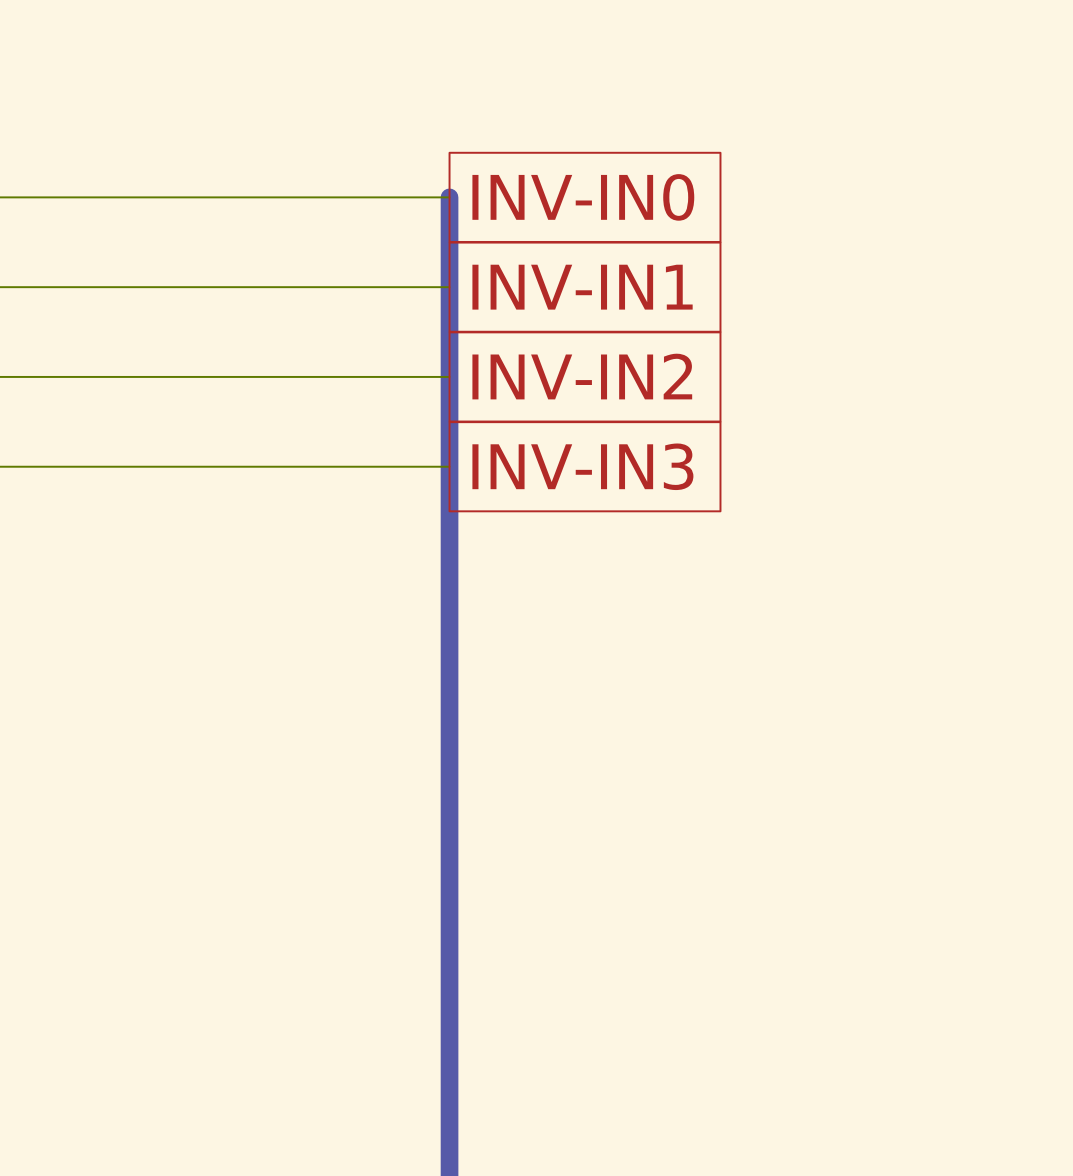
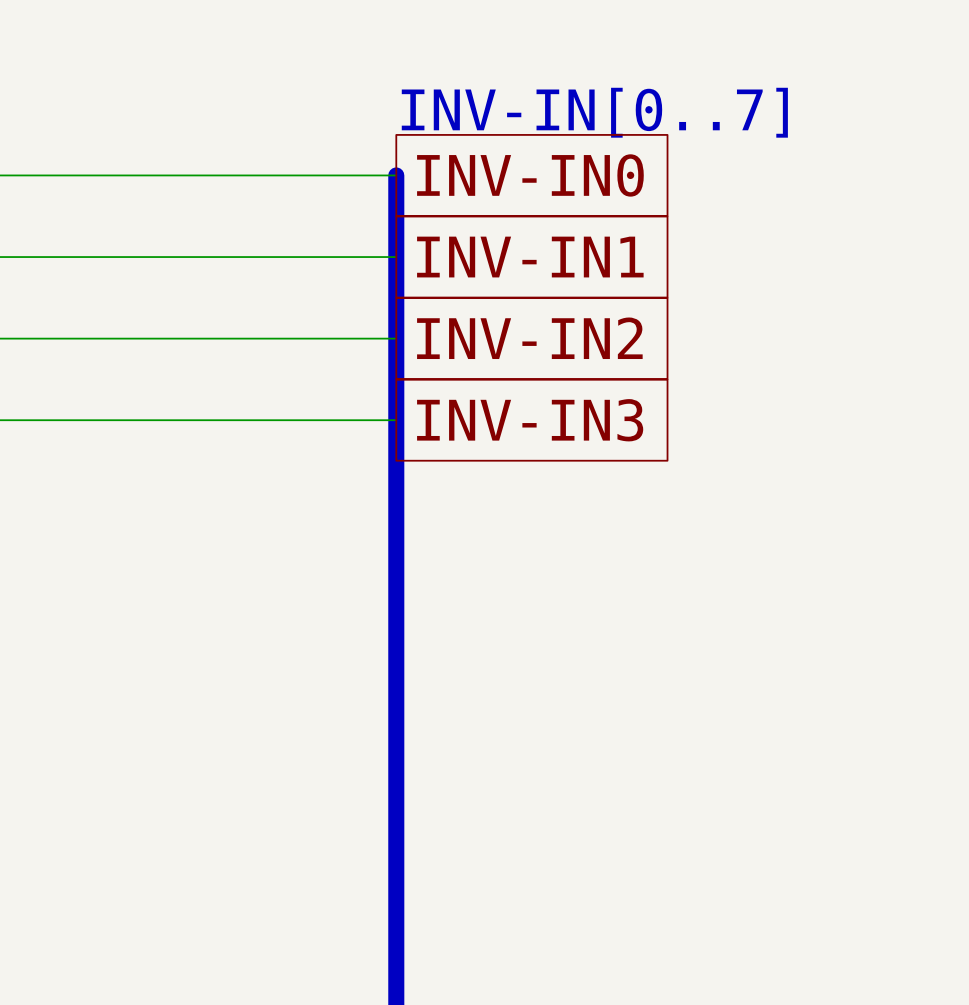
text: none -> INV-IN[0..7] (594, 112)

